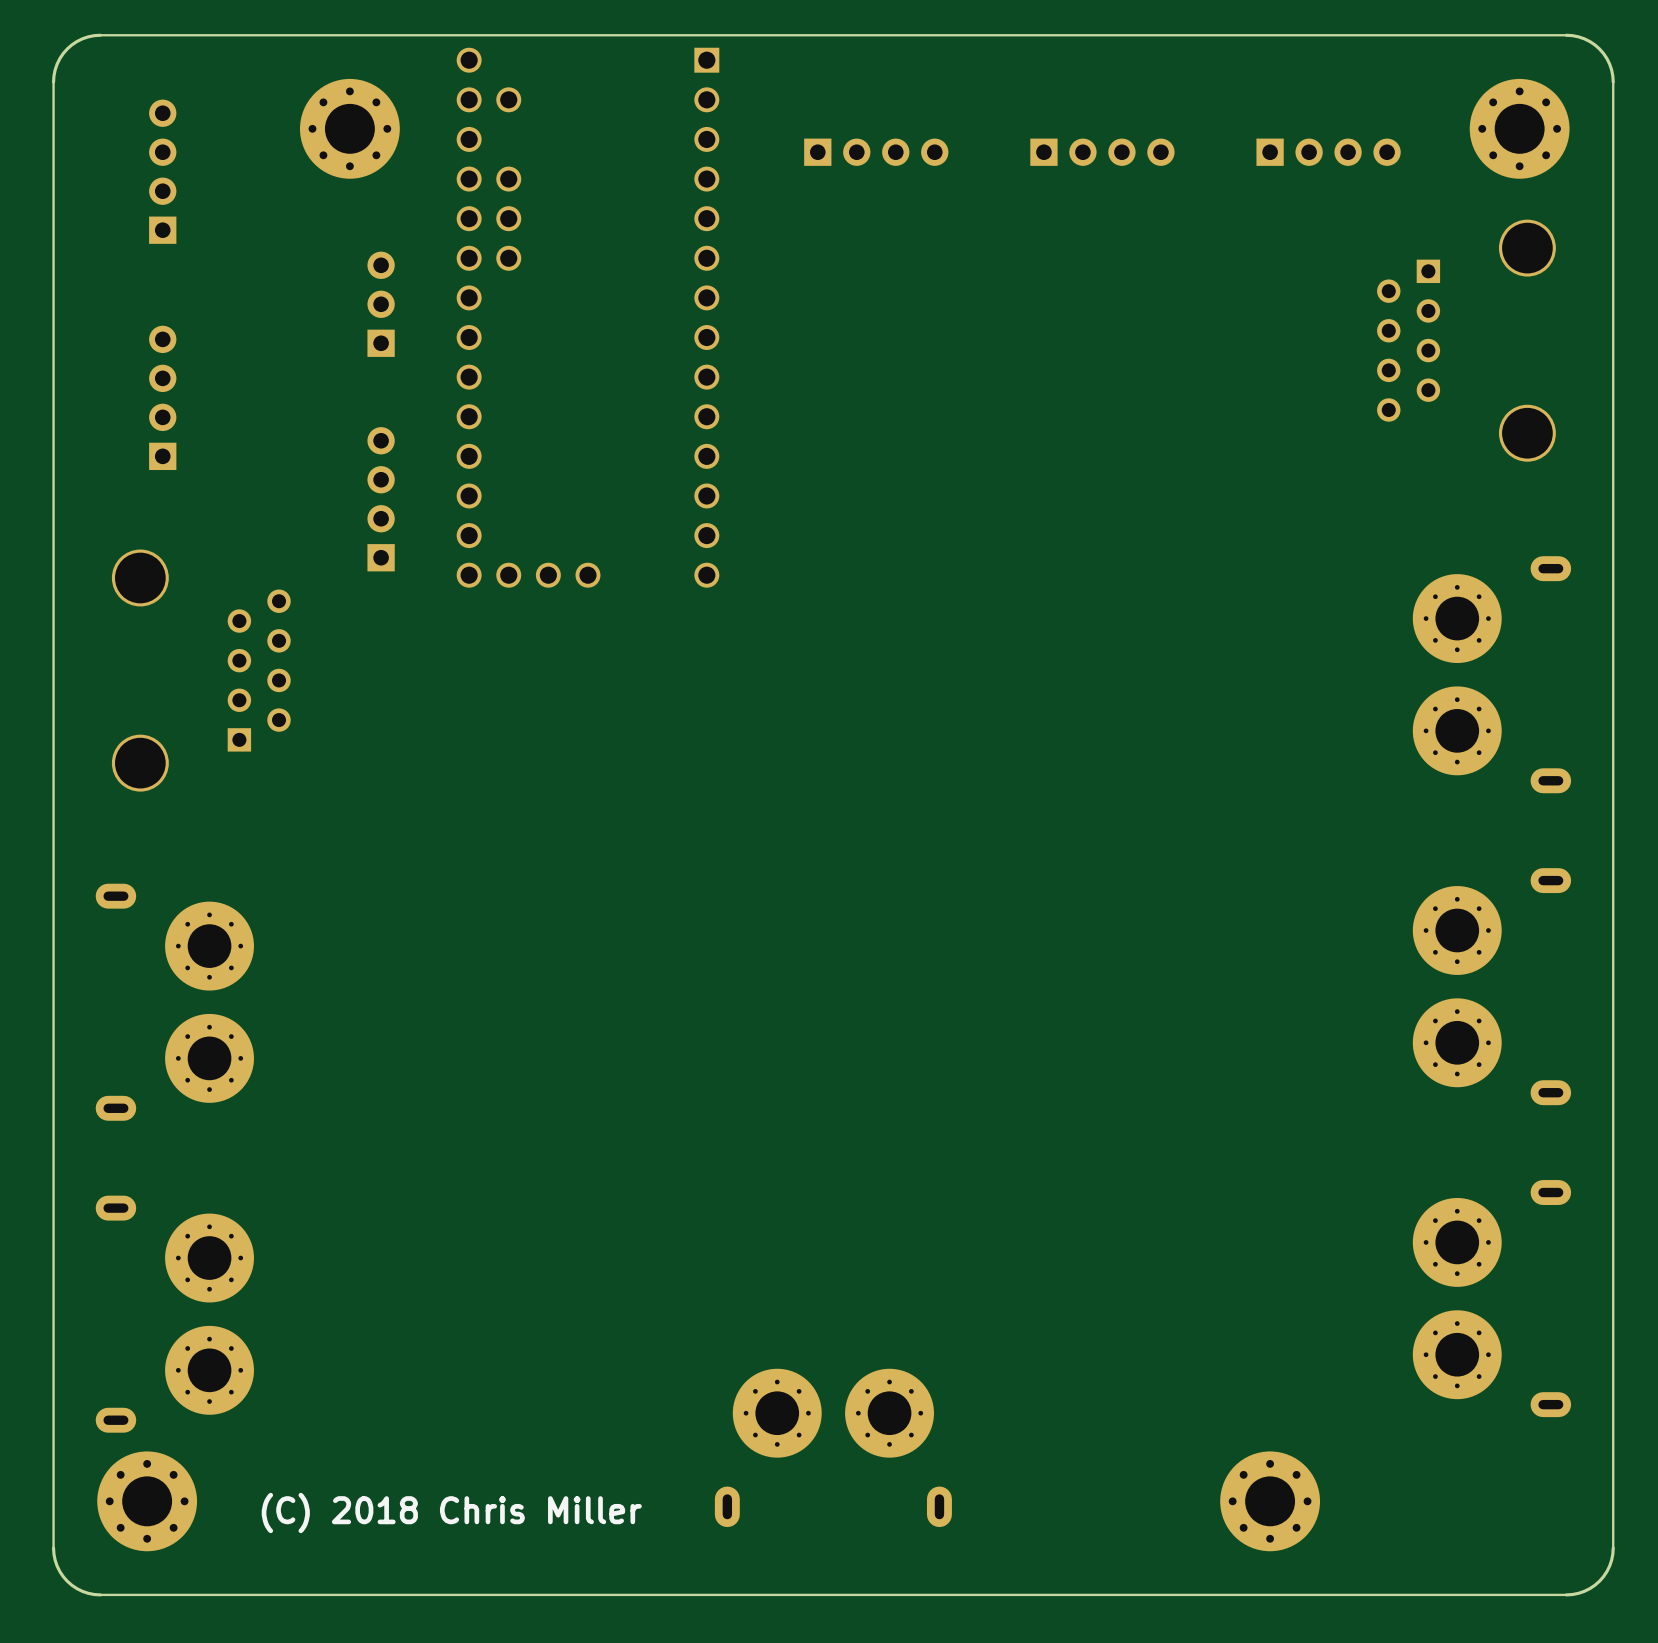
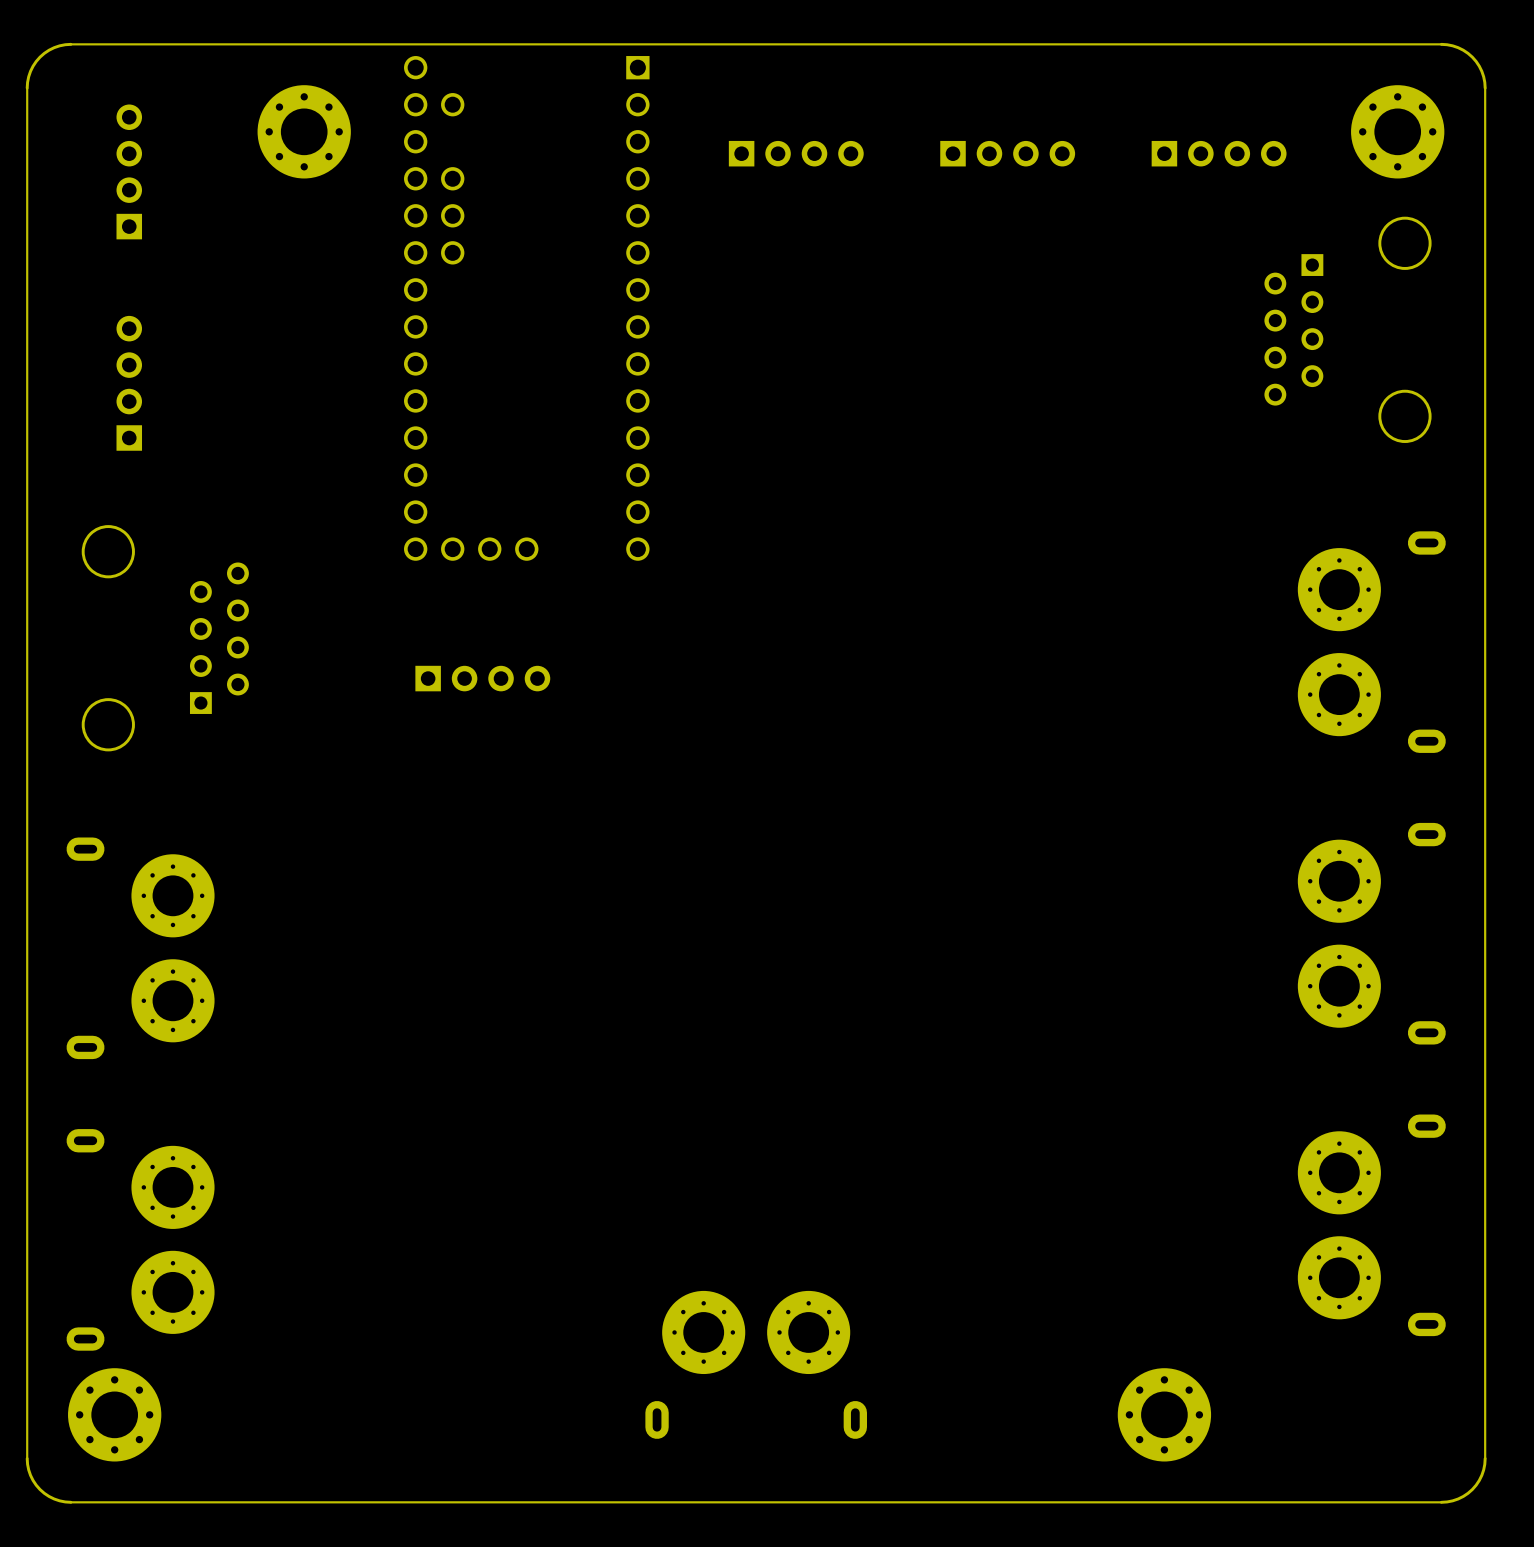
part: (381, 304) -> none
part rotation: 0° (381, 499) -> 90° clockwise (482, 678)
part position: (381, 499) -> (482, 678)
text: (C) 2018 Chris Miller (451, 1512) -> none

